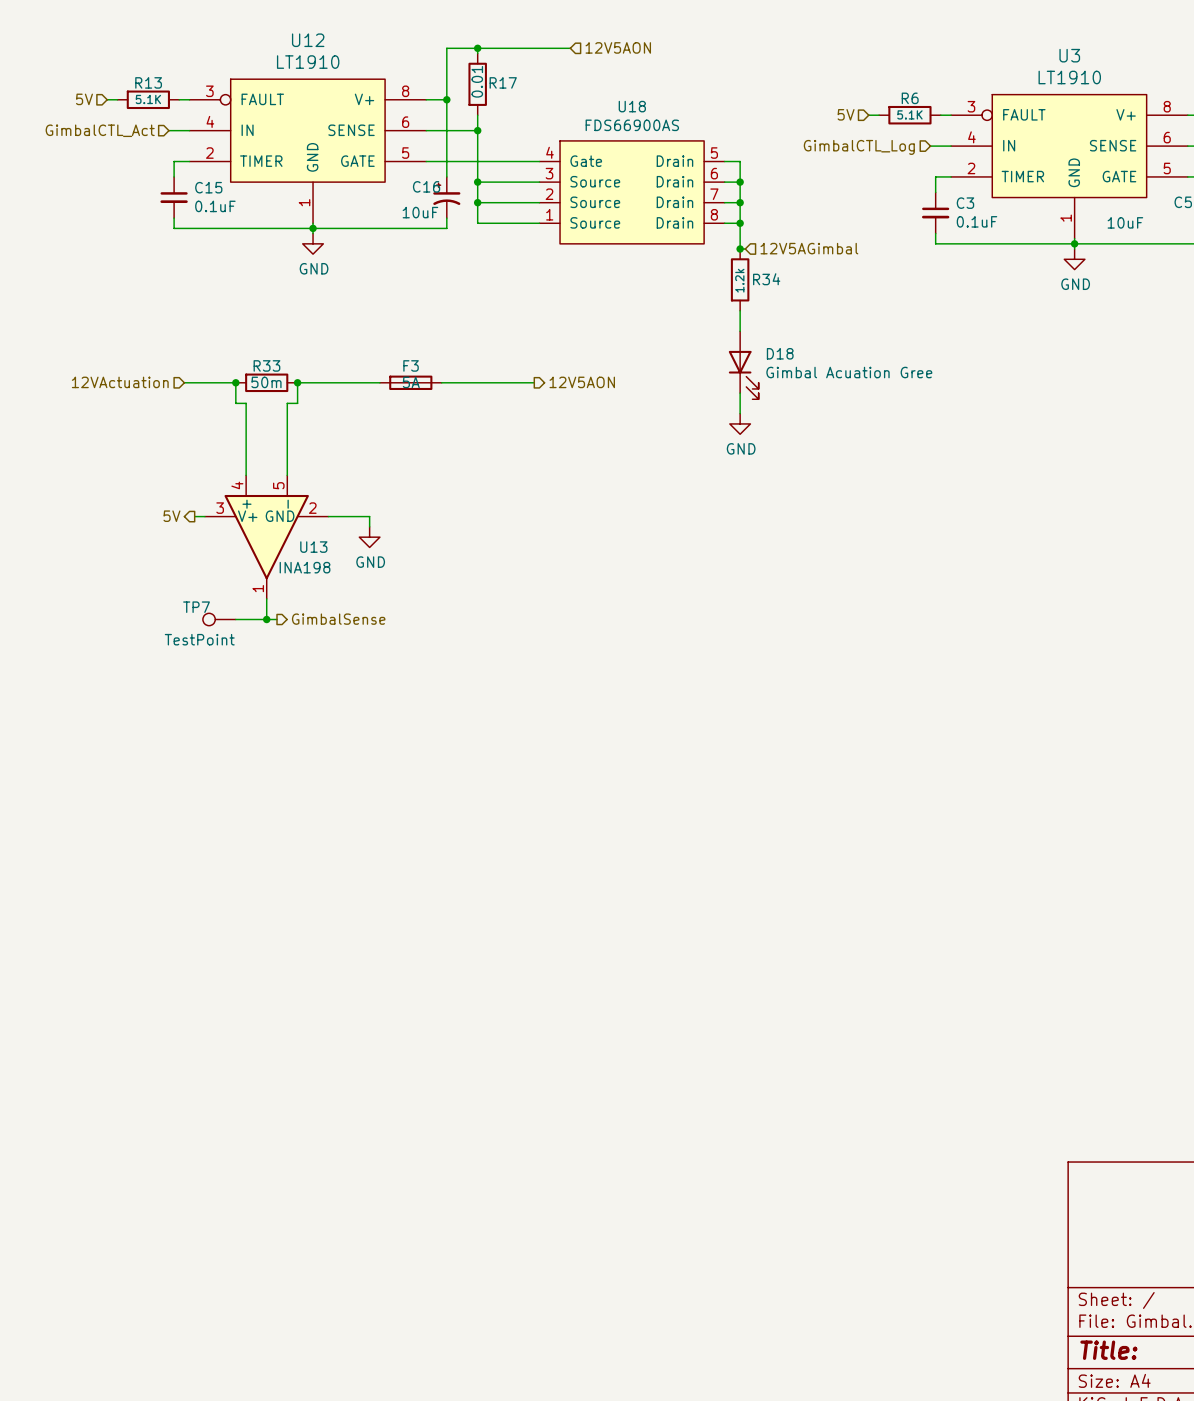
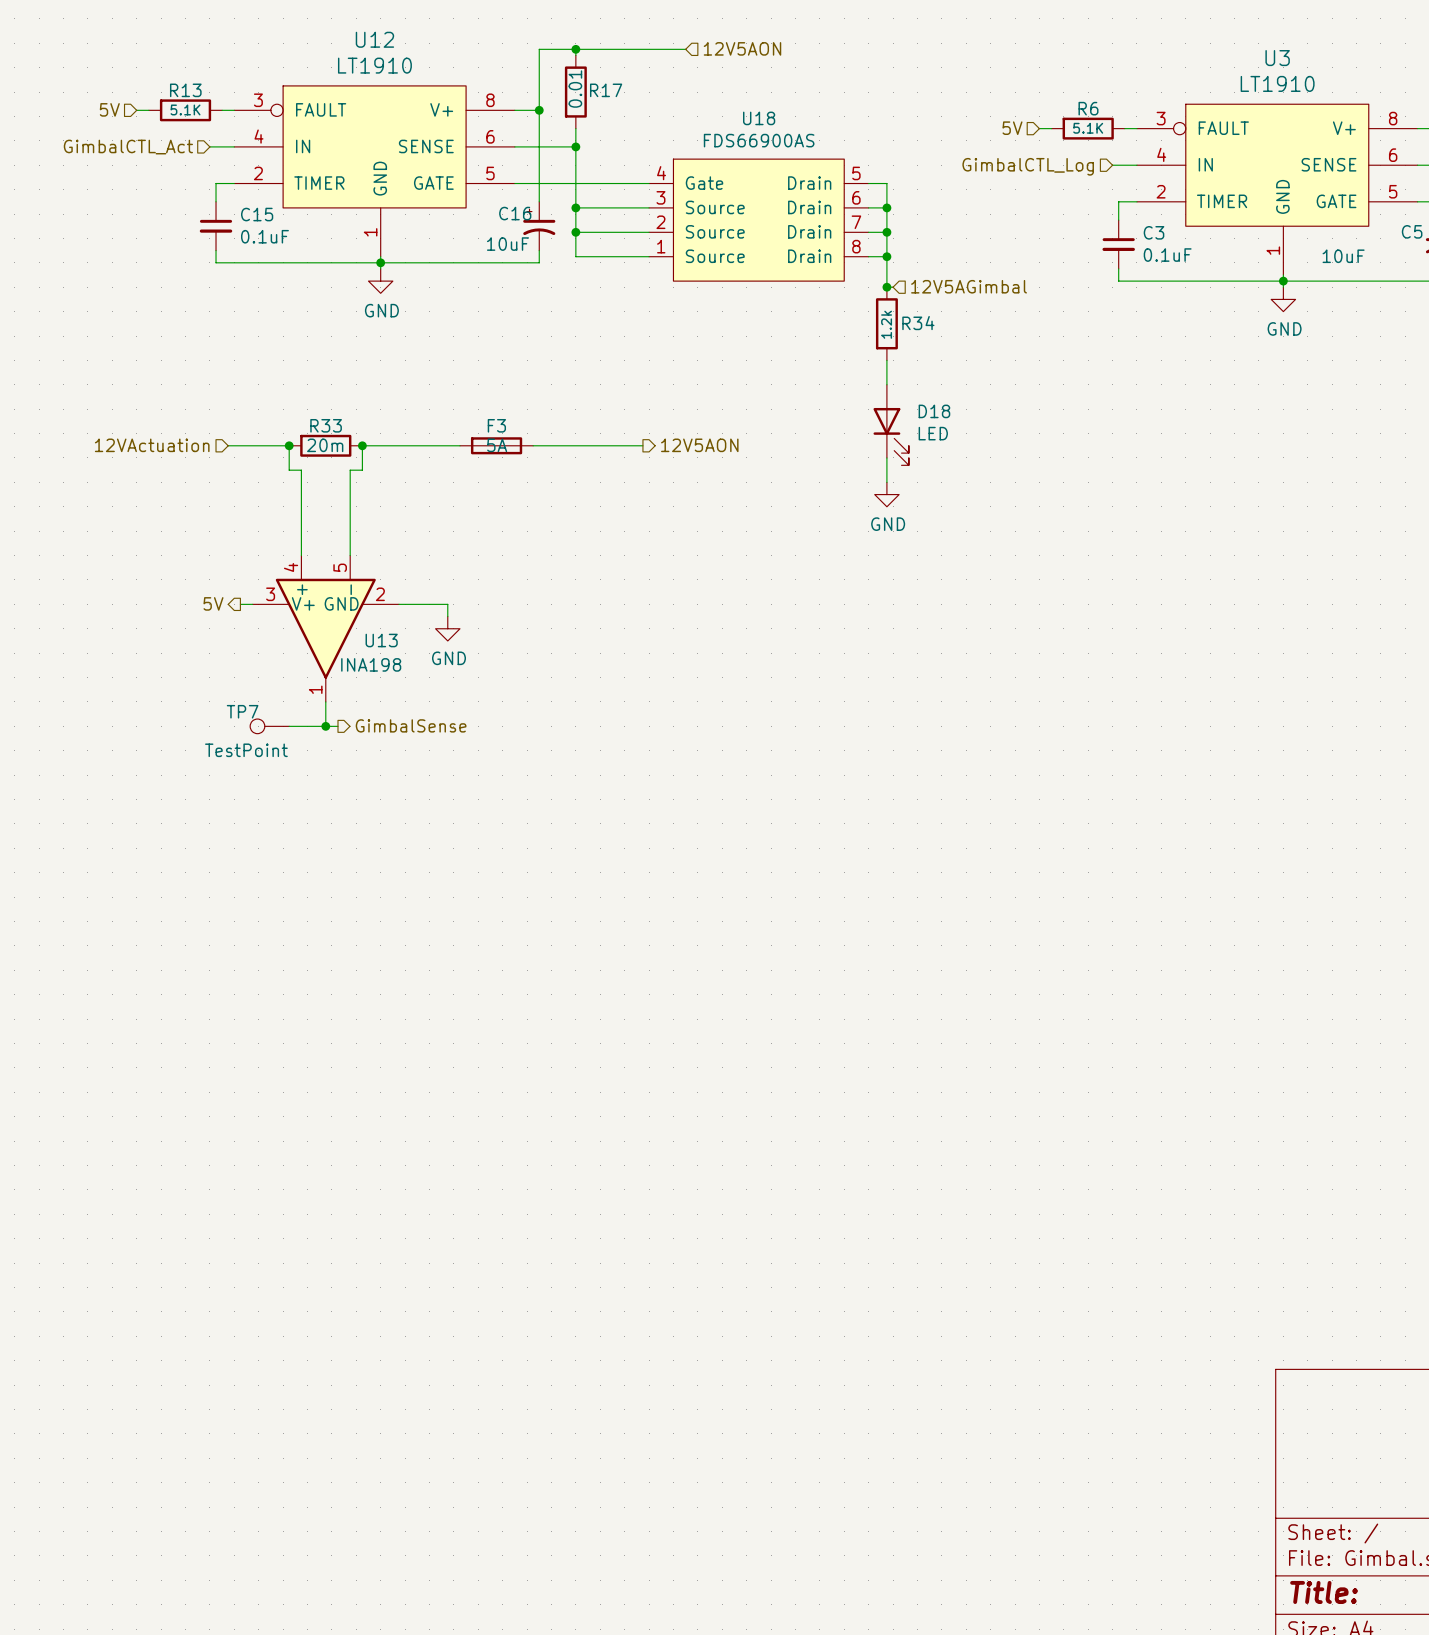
D18 value: Gimbal Acuation Gree (849, 372) -> LED (933, 433)
R33 value: 50m (266, 382) -> 20m (325, 445)

